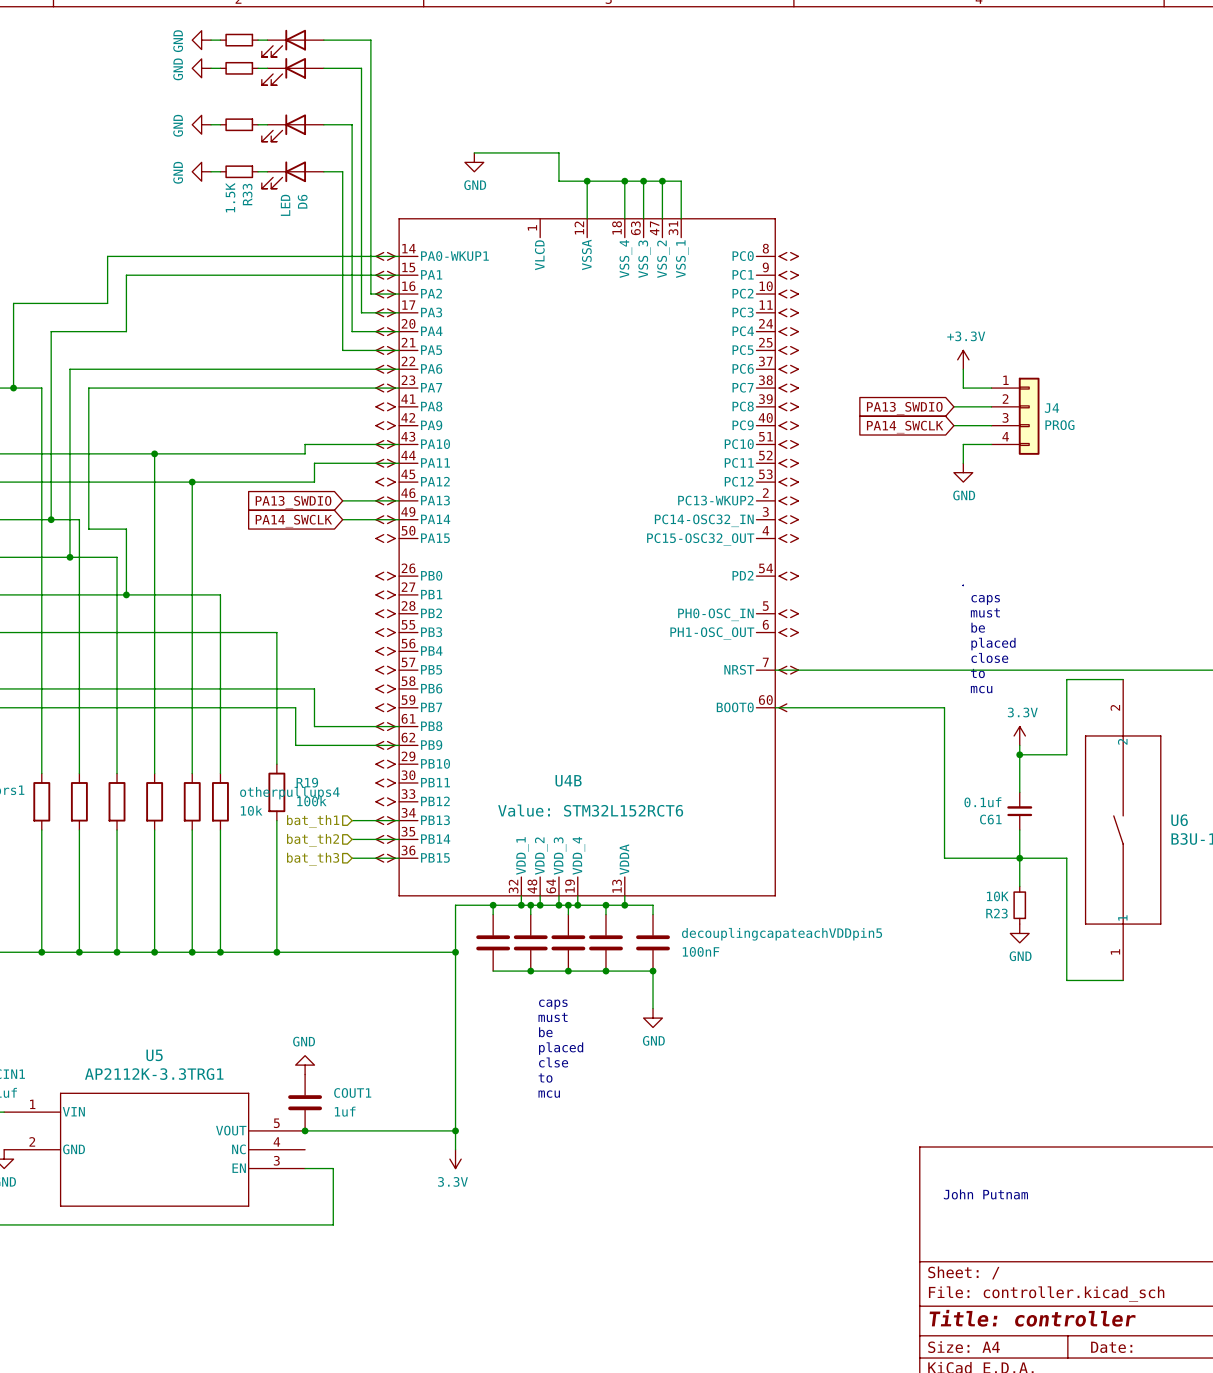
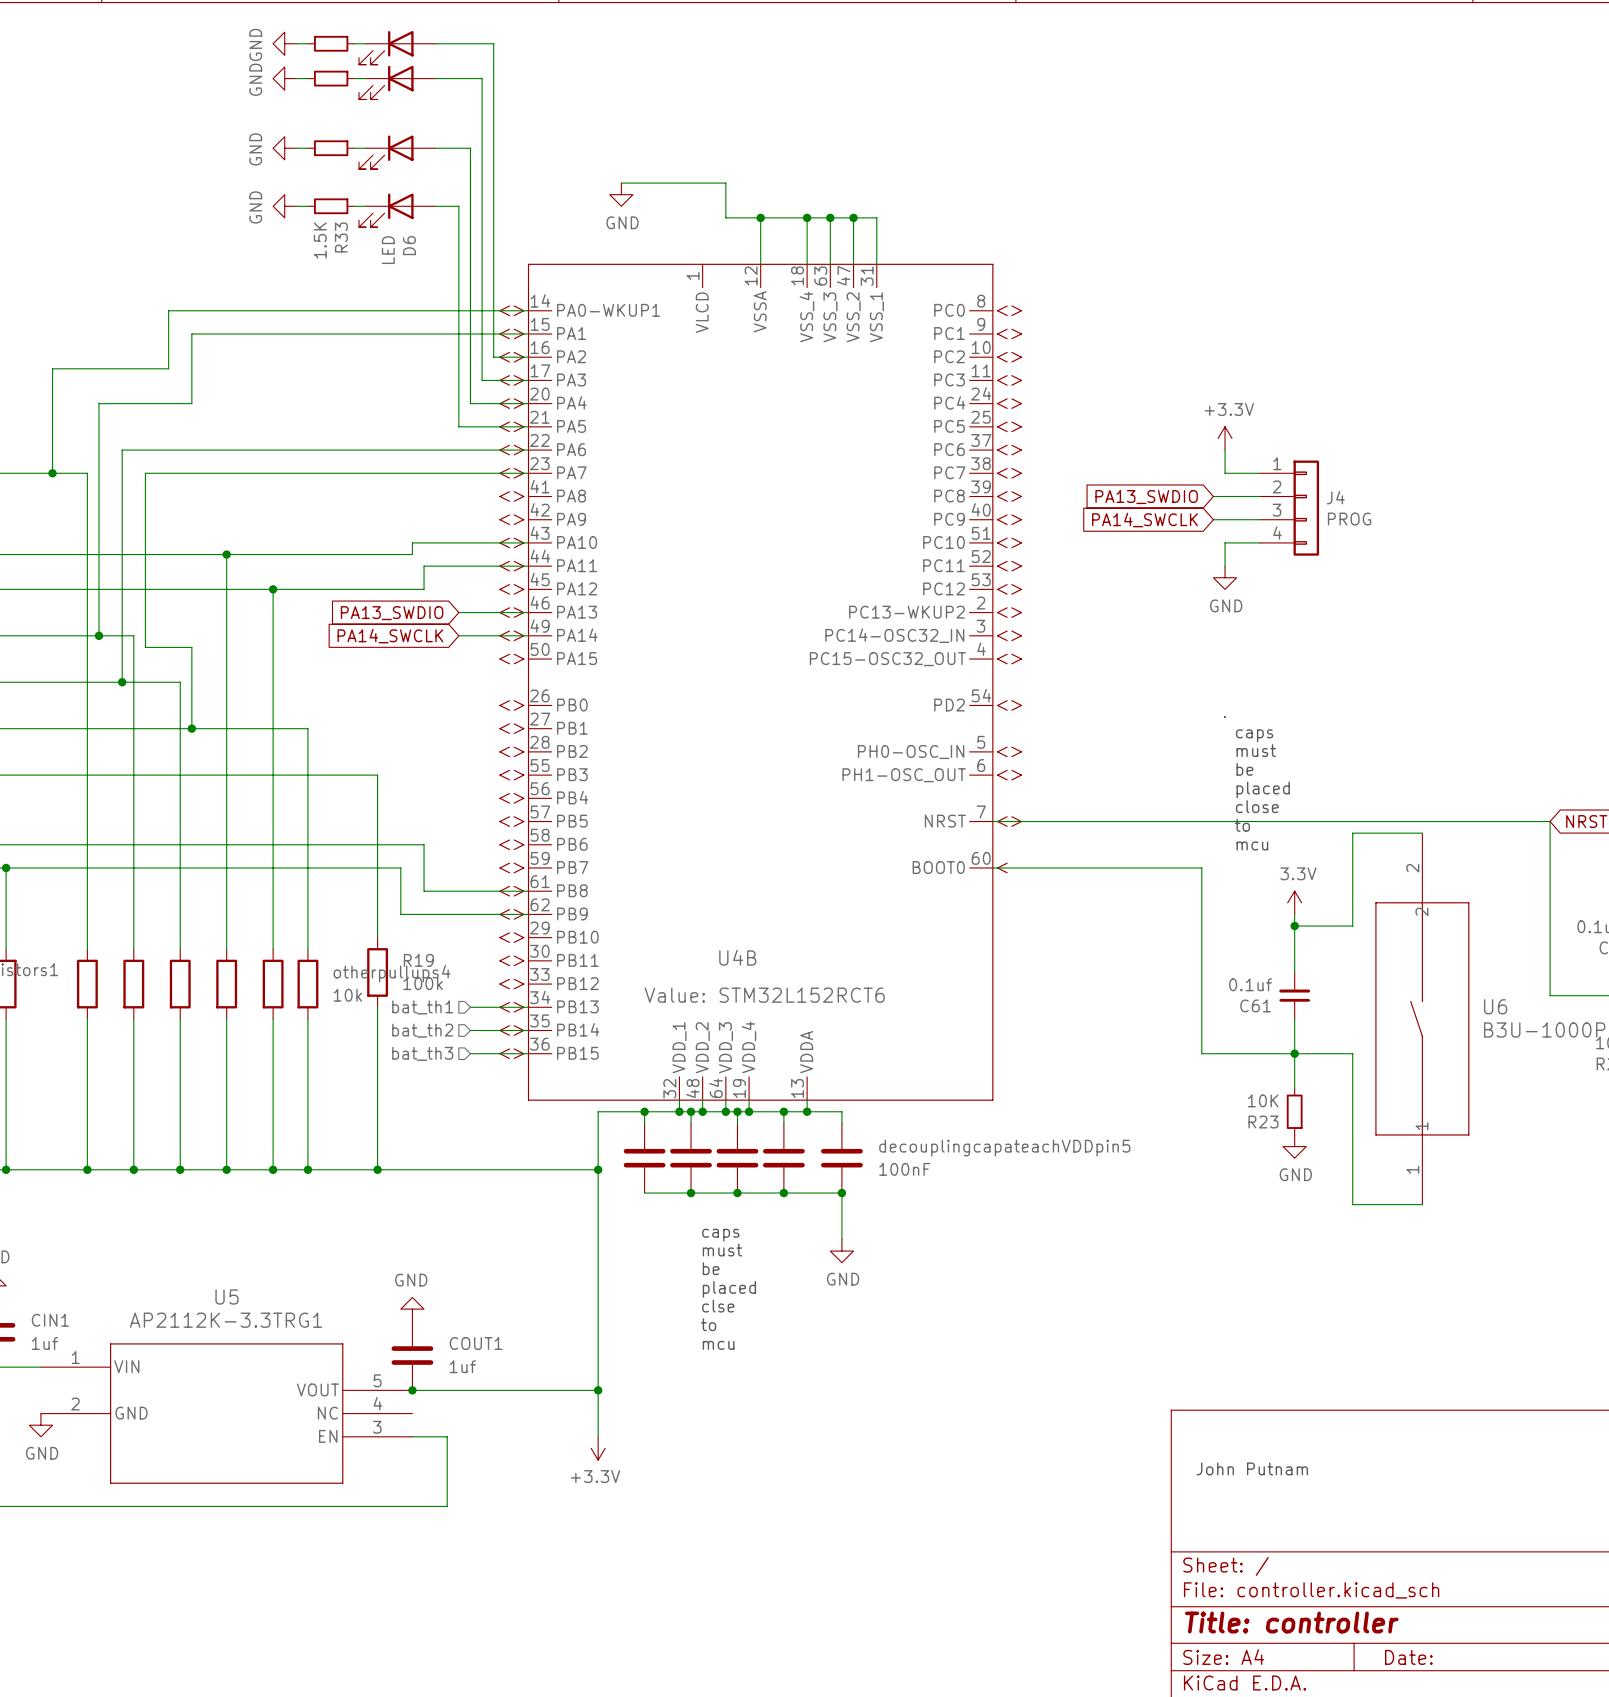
power symbol: 3.3V (455, 1159) -> none
power symbol: none -> +3.3V (598, 1448)

